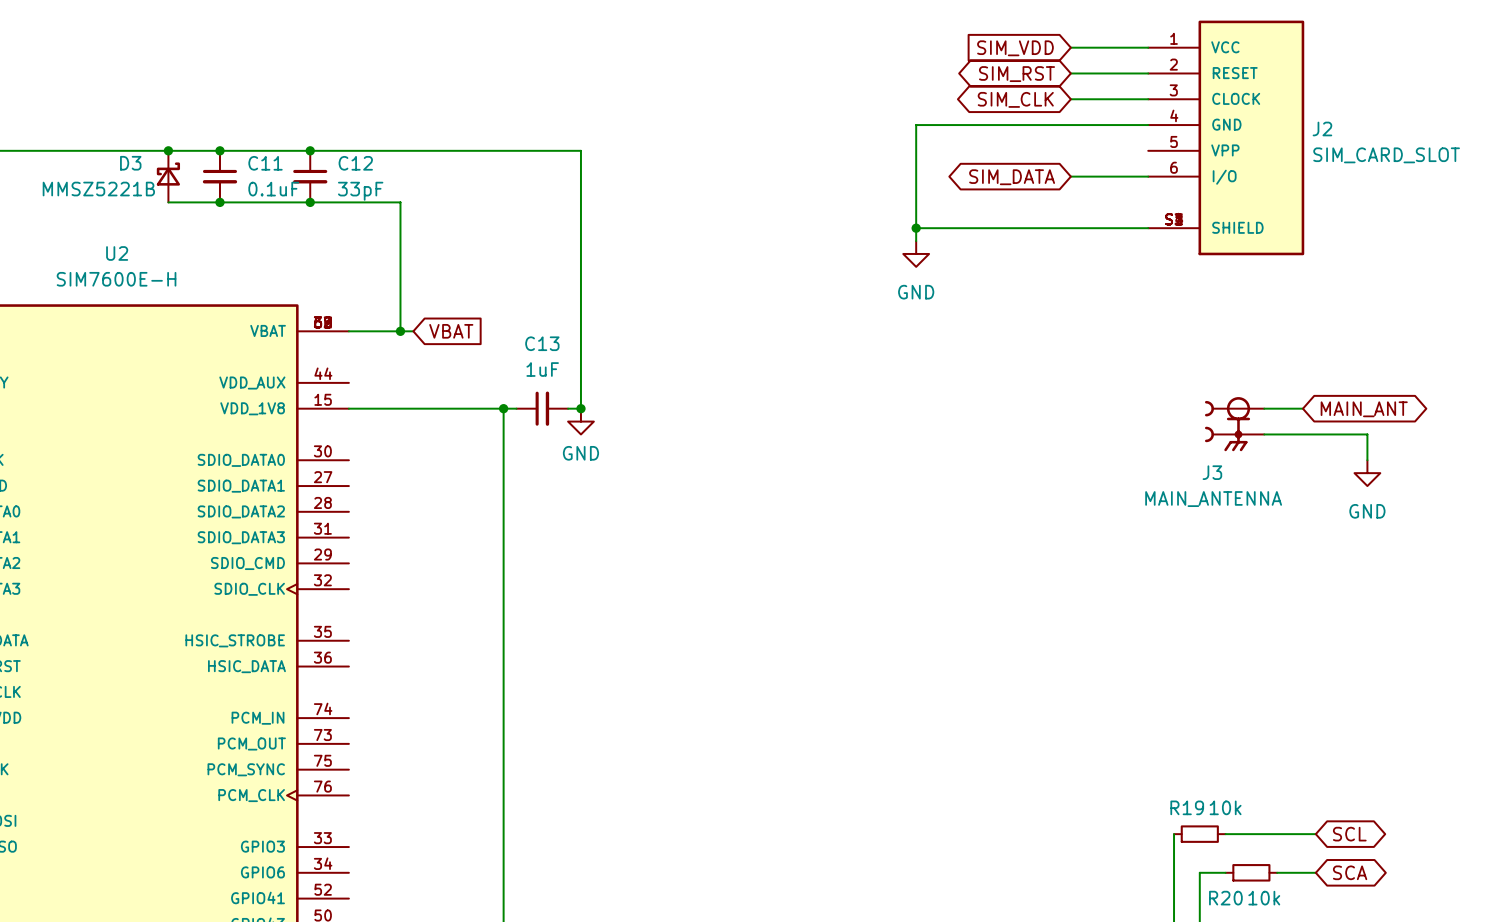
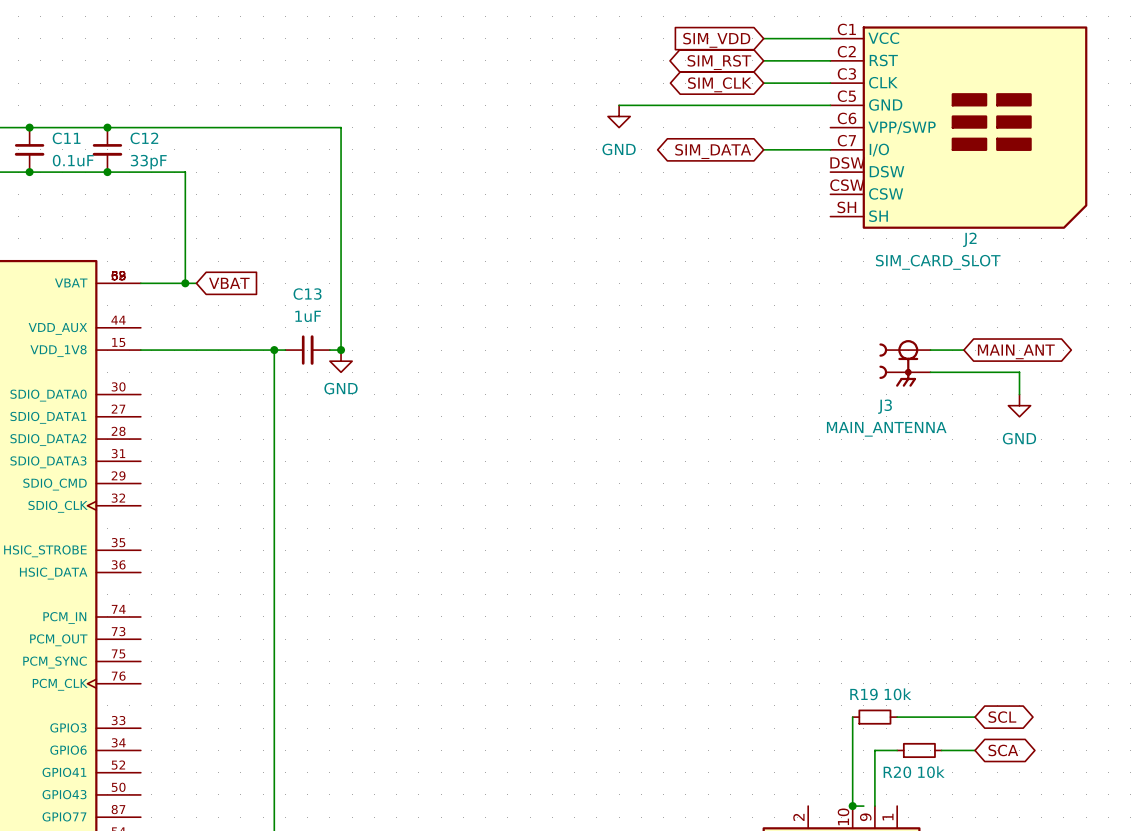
J2 symbol: [1148, 20, 1305, 256] -> [830, 26, 1088, 229]
wire: (916, 125) (916, 241) -> (630, 105) (619, 105)
J2 name position: J2 (1322, 128) -> J2 (969, 239)
J2 value position: SIM_CARD_SLOT (1386, 155) -> SIM_CARD_SLOT (938, 262)
wire: (916, 228) (1148, 228) -> none
junction: (916, 228) -> none
power symbol position: GND (916, 253) -> GND (619, 116)

